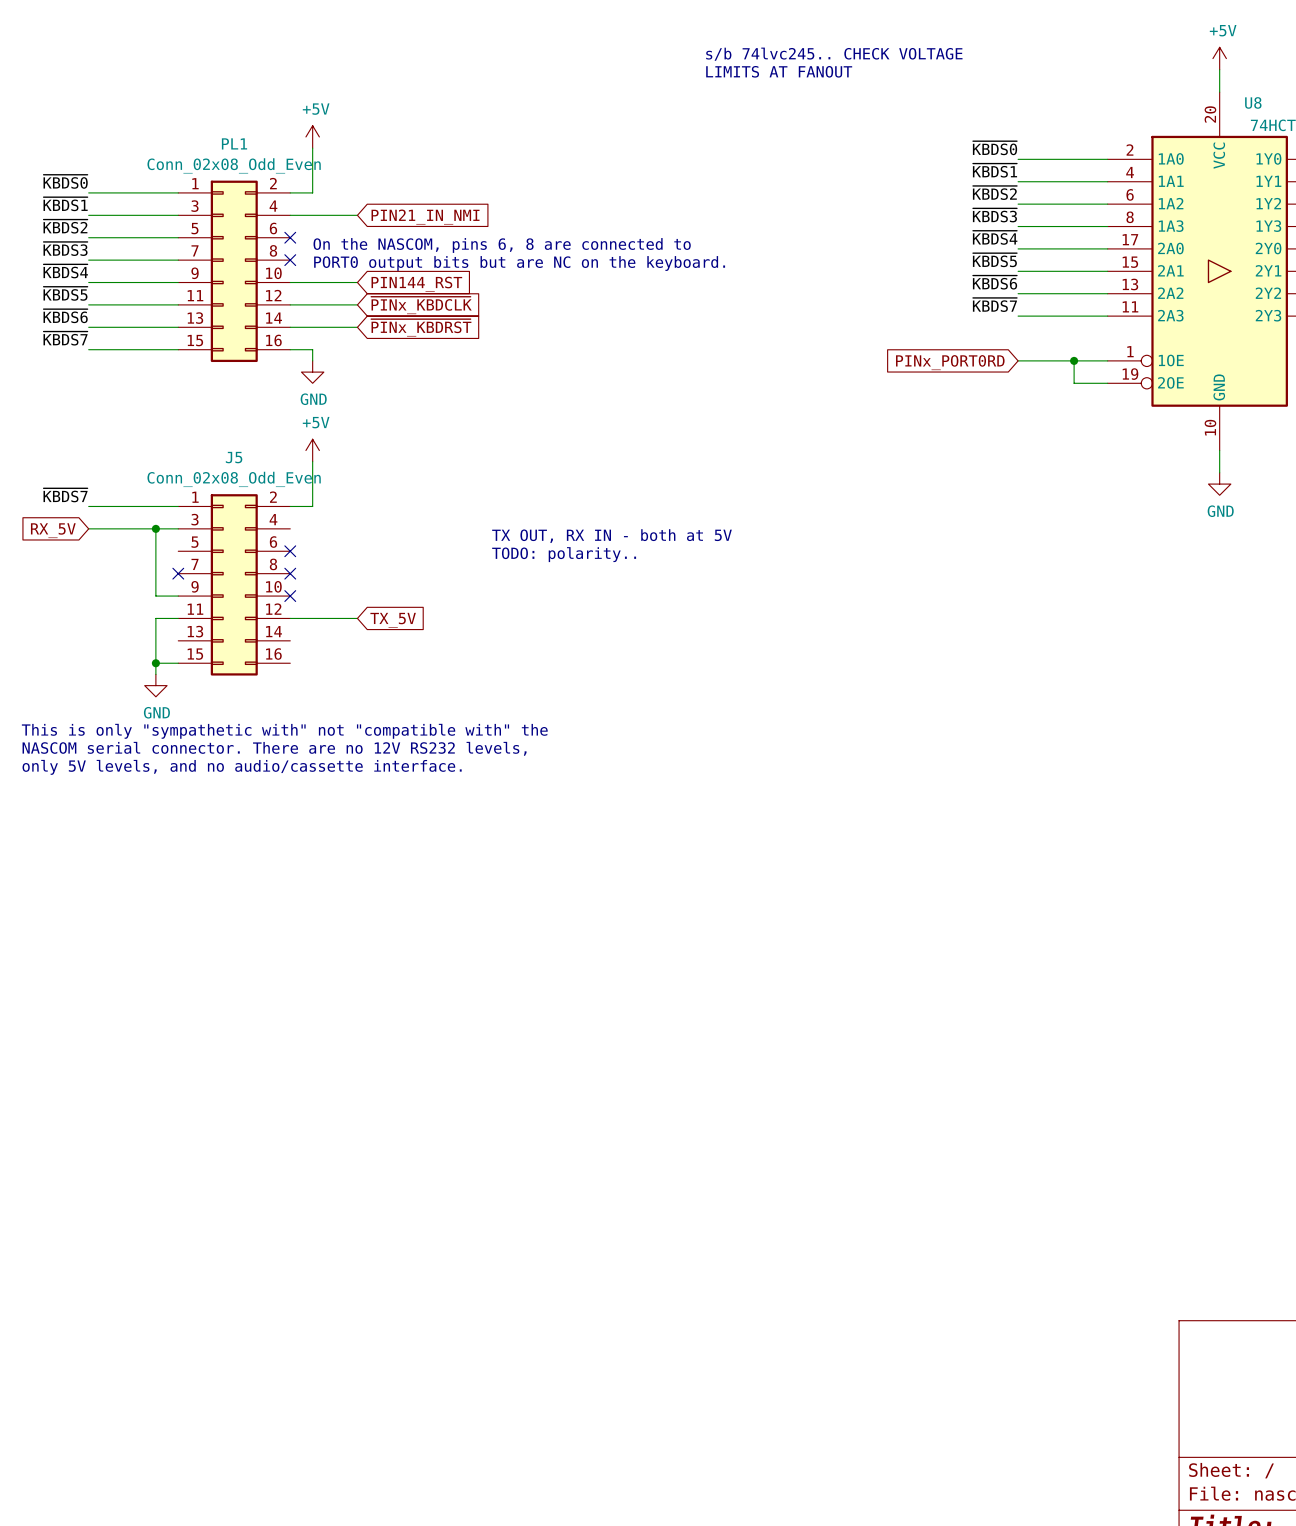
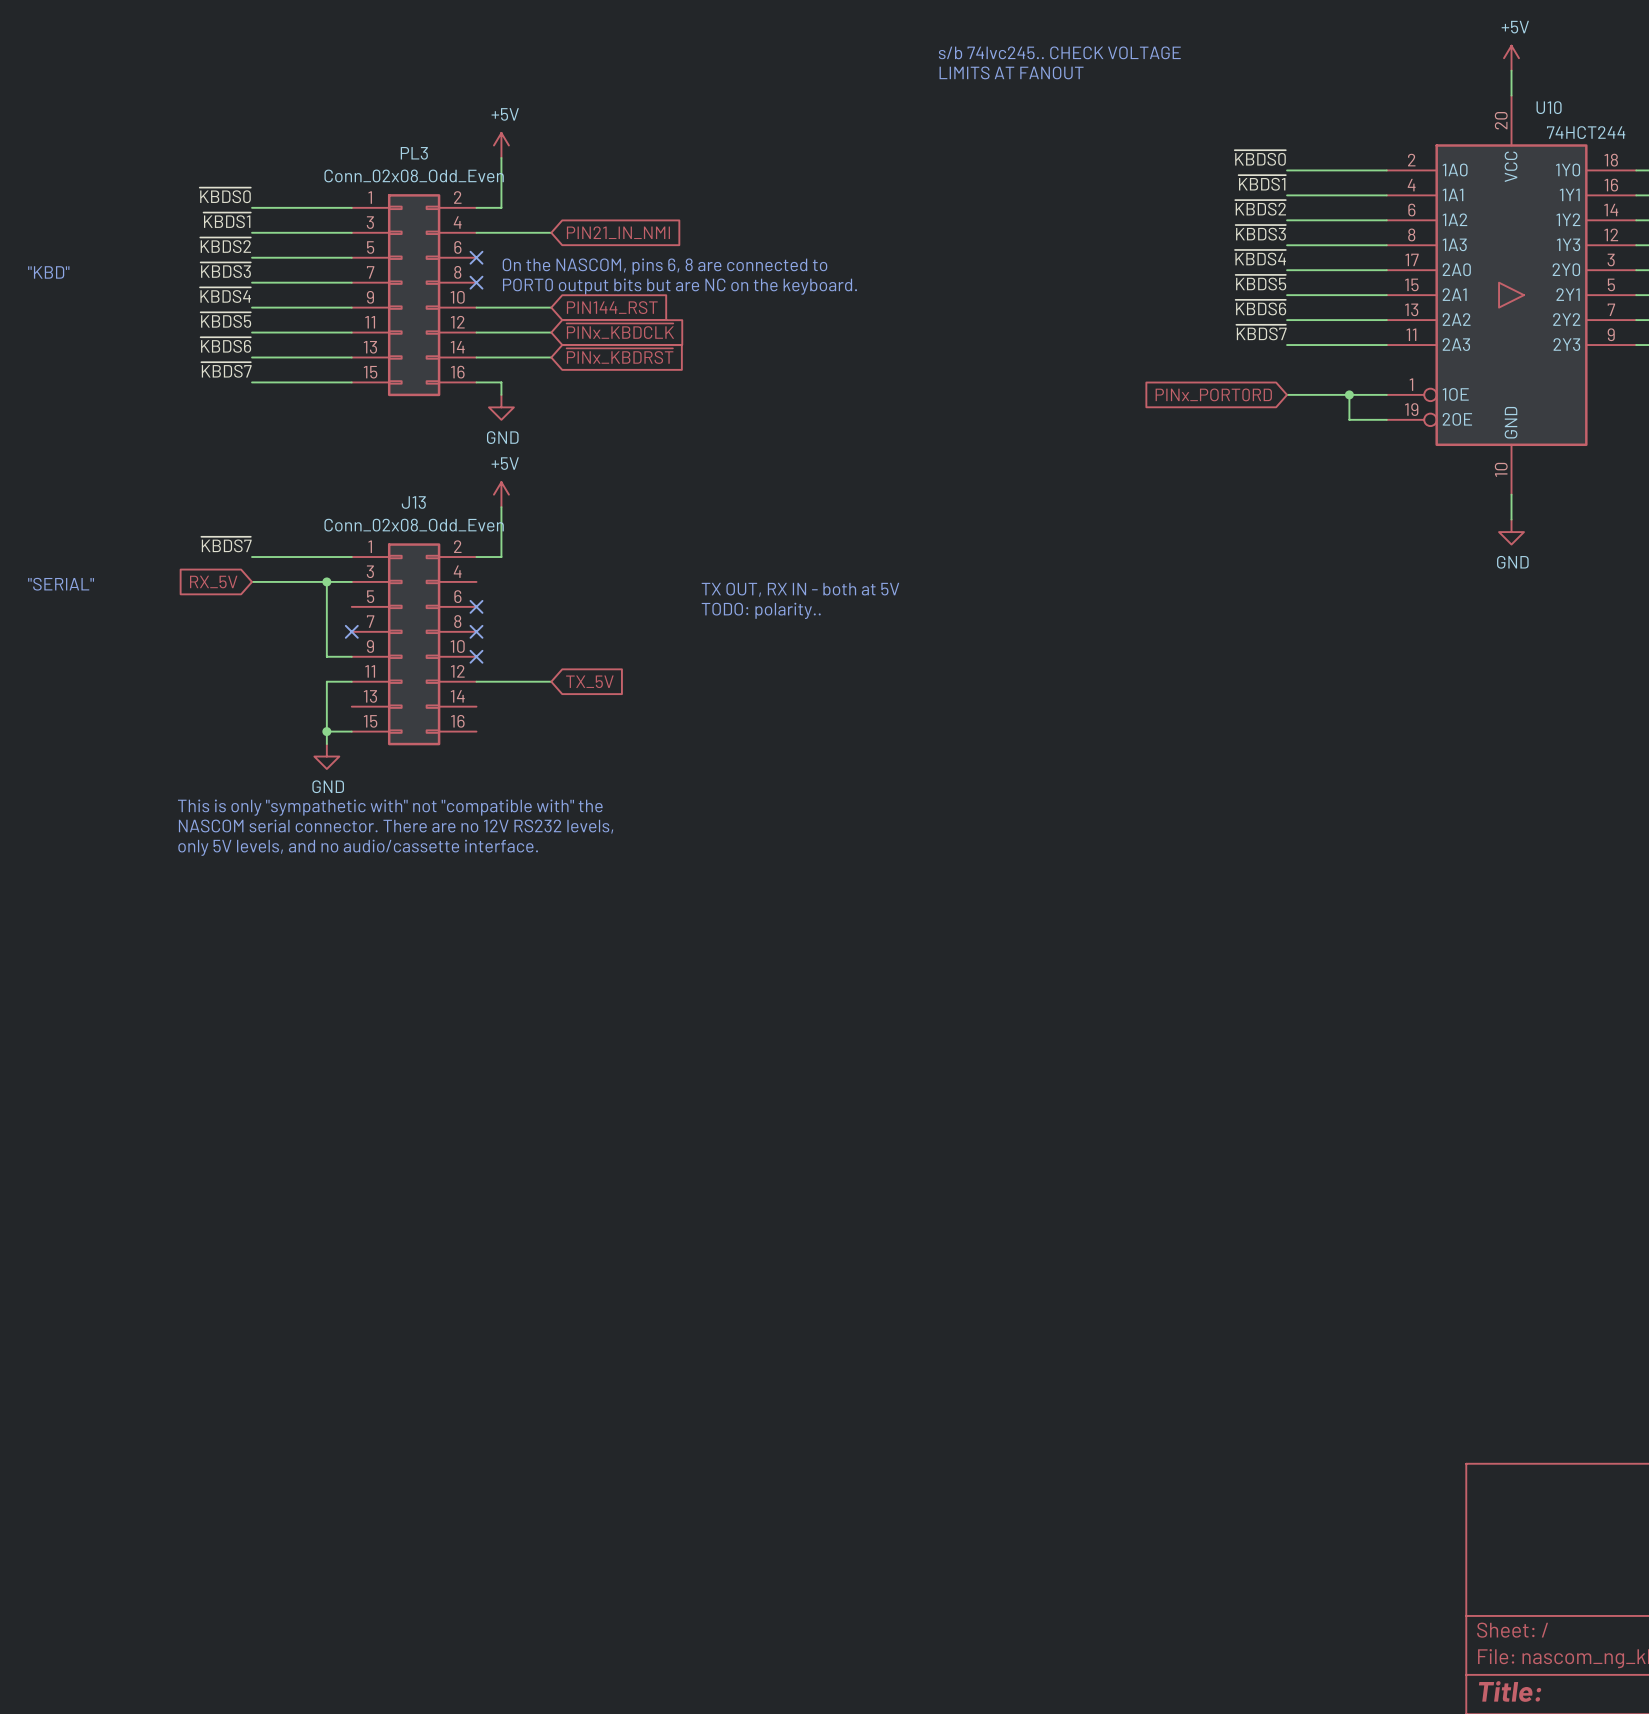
U8 name: U8 (1253, 102) -> U10 (1549, 107)
PL1 name: PL1 (234, 143) -> PL3 (414, 153)
J5 name: J5 (234, 457) -> J13 (413, 502)

